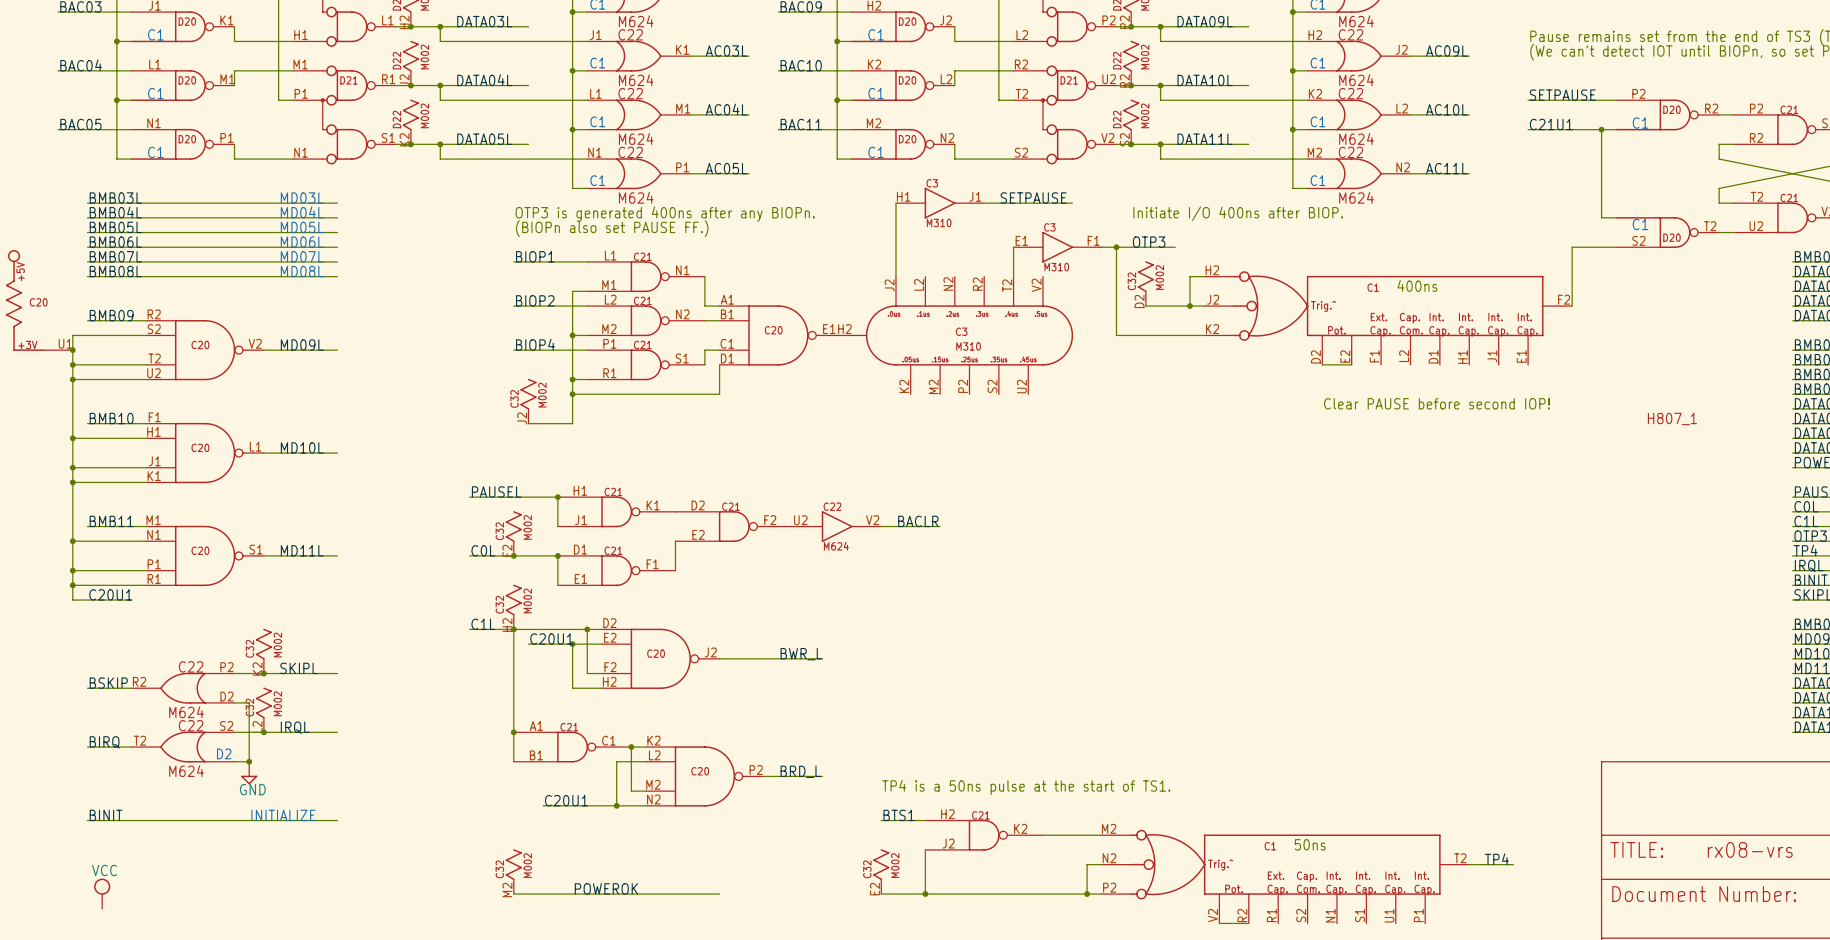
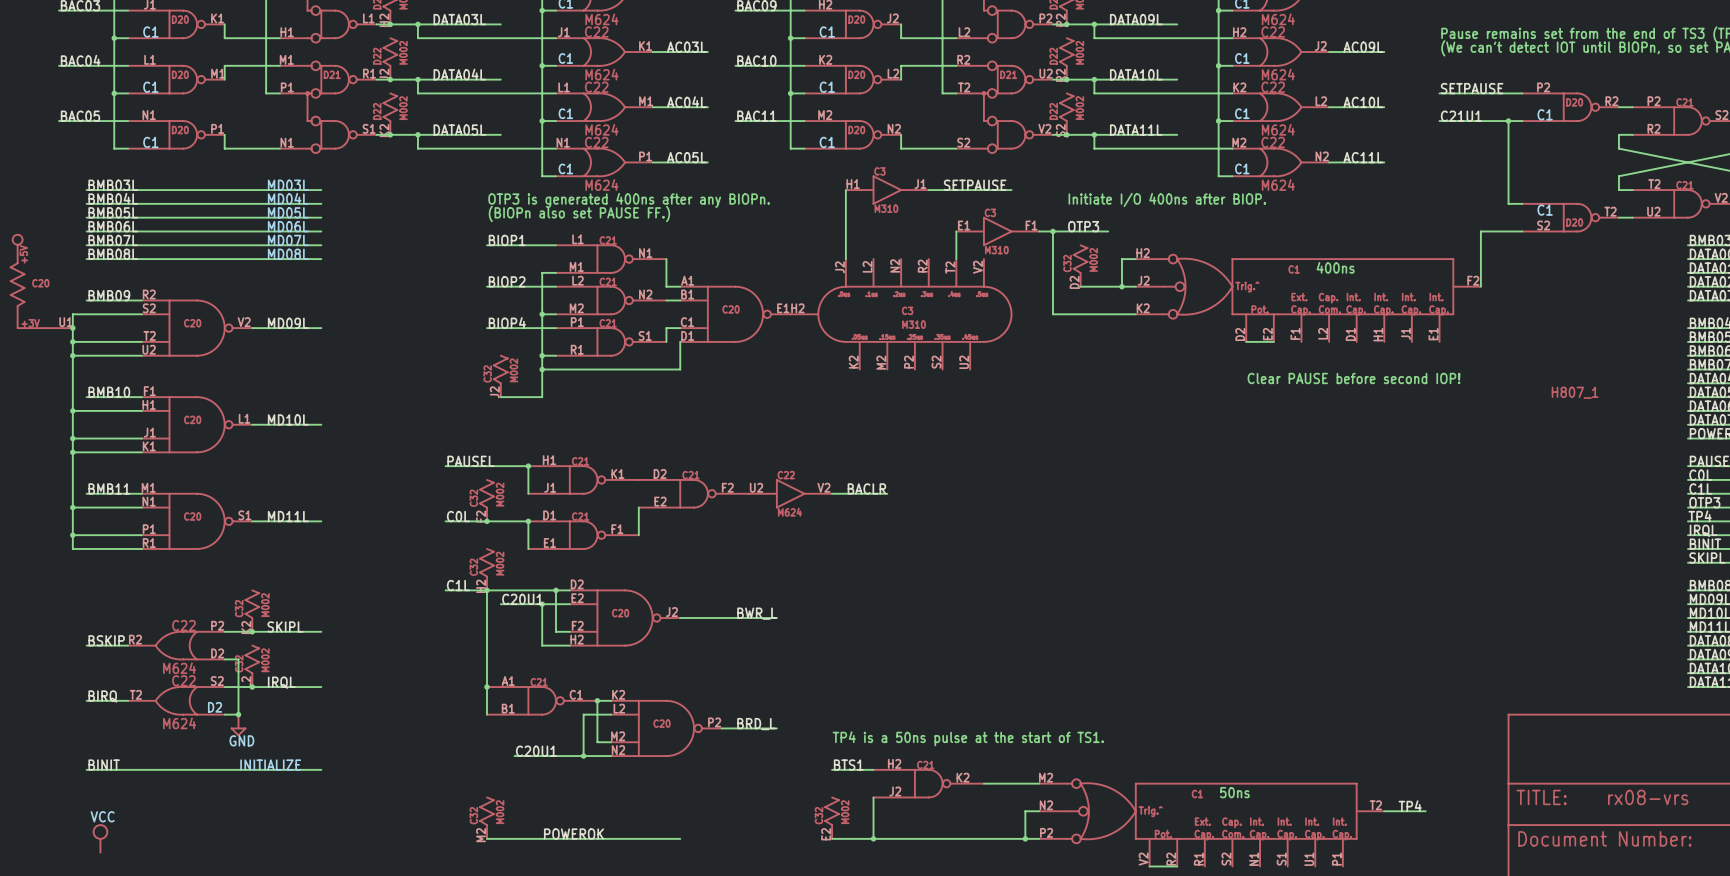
wire: (72, 585) (72, 600) (131, 600) -> none
junction: (72, 585) -> none
label: C20U1 (110, 594) -> none

